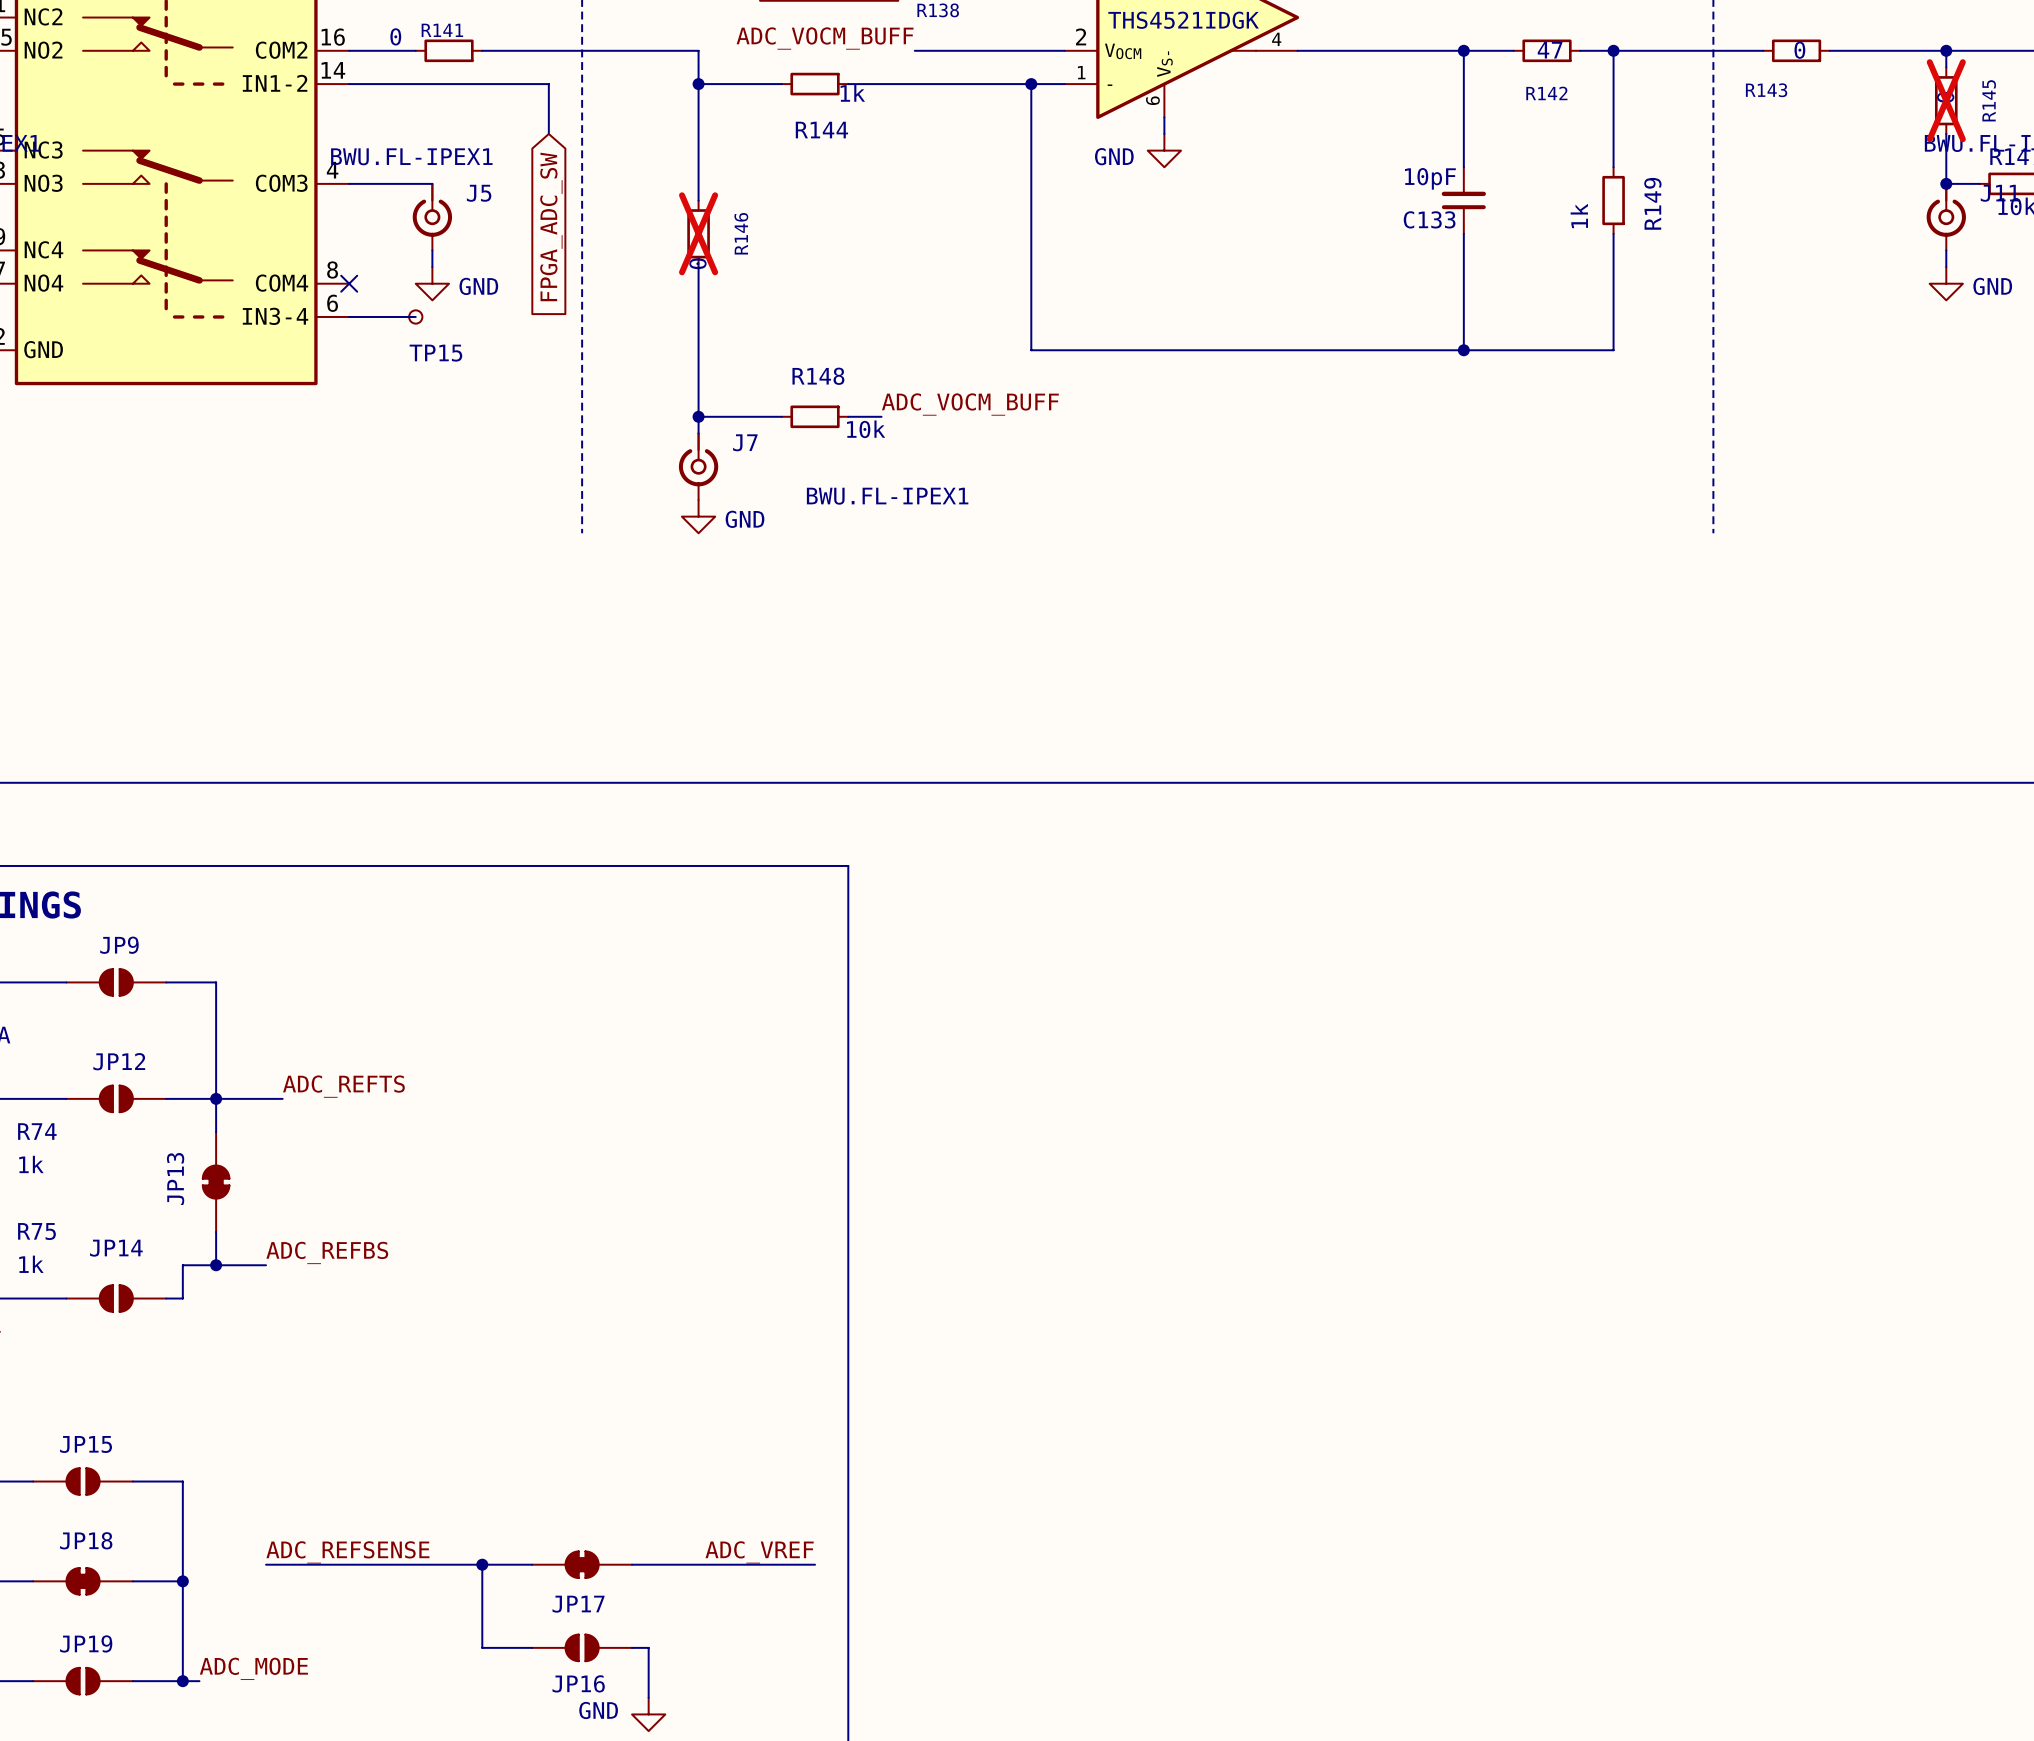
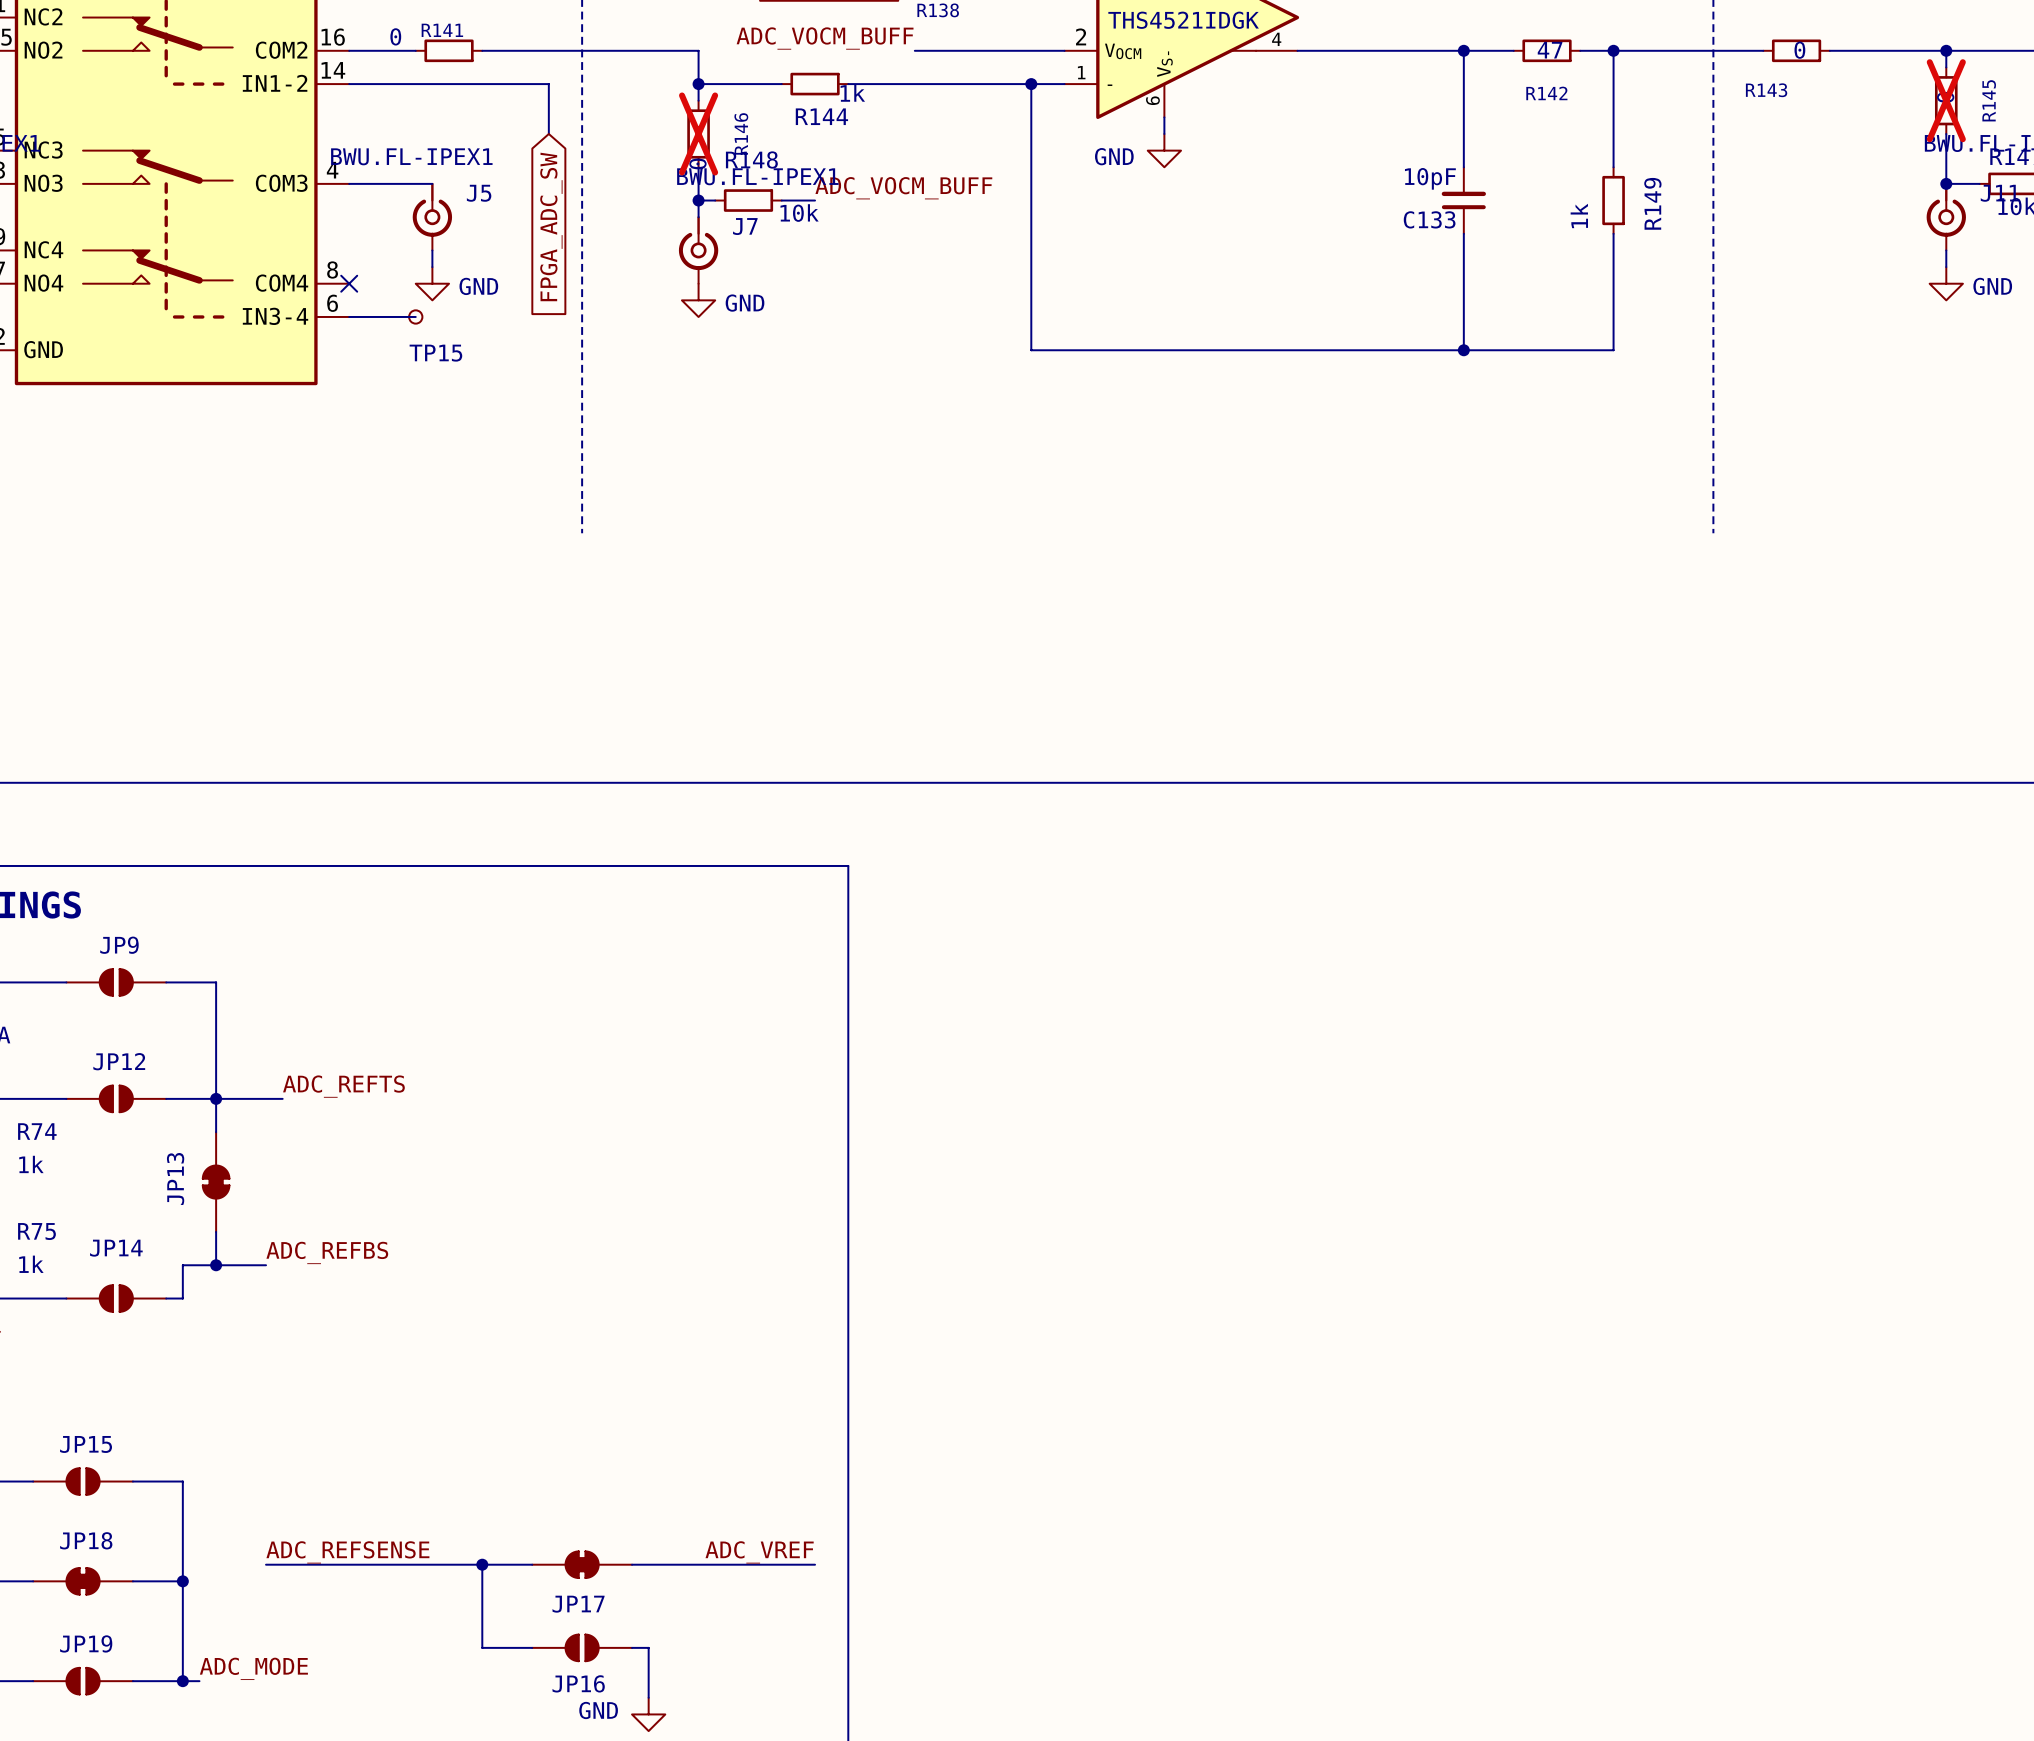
R144 name position: R144 (821, 130) -> R144 (821, 116)
junction: none -> (698, 200)
R146 position: (698, 233) -> (698, 133)
wire: (698, 267) (698, 433) -> none
label position: ADC_VOCM_BUFF (970, 404) -> ADC_VOCM_BUFF (903, 188)
wire: (698, 416) (781, 416) -> none
junction: (698, 416) -> none
R148 position: (815, 416) -> (748, 200)
wire: (848, 416) (881, 416) -> (781, 200) (815, 200)
J7 position: (698, 466) -> (698, 250)
J7 value position: BWU.FL-IPEX1 (887, 496) -> BWU.FL-IPEX1 (757, 176)
power symbol position: GND (698, 516) -> GND (698, 300)

